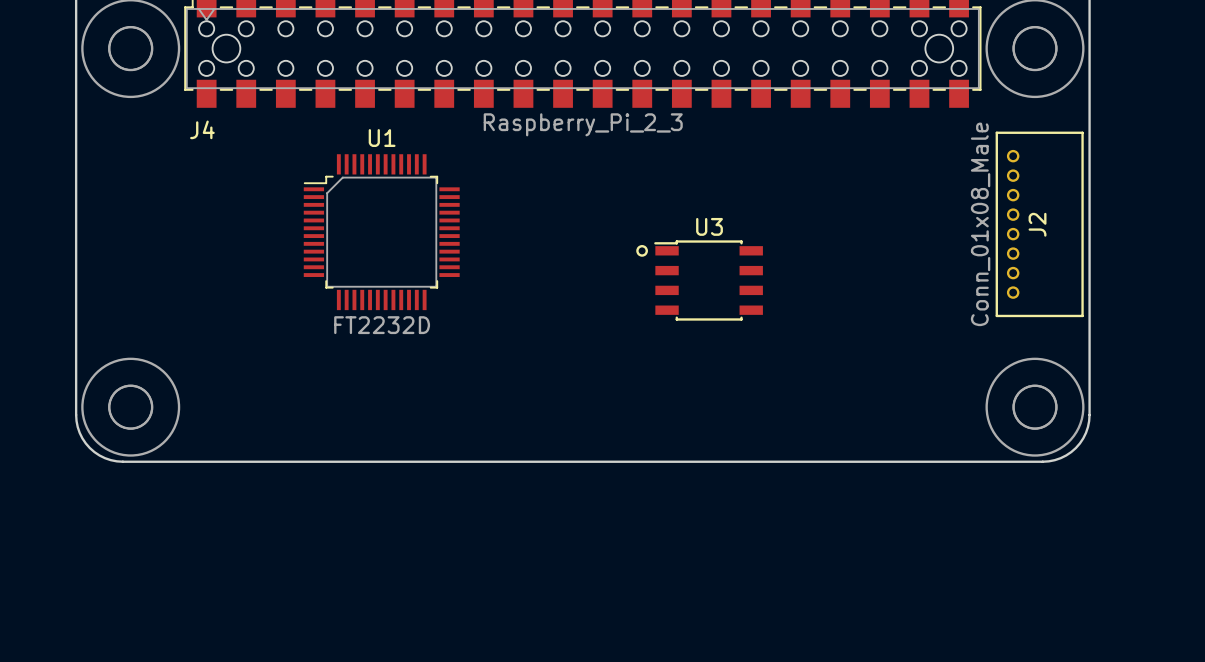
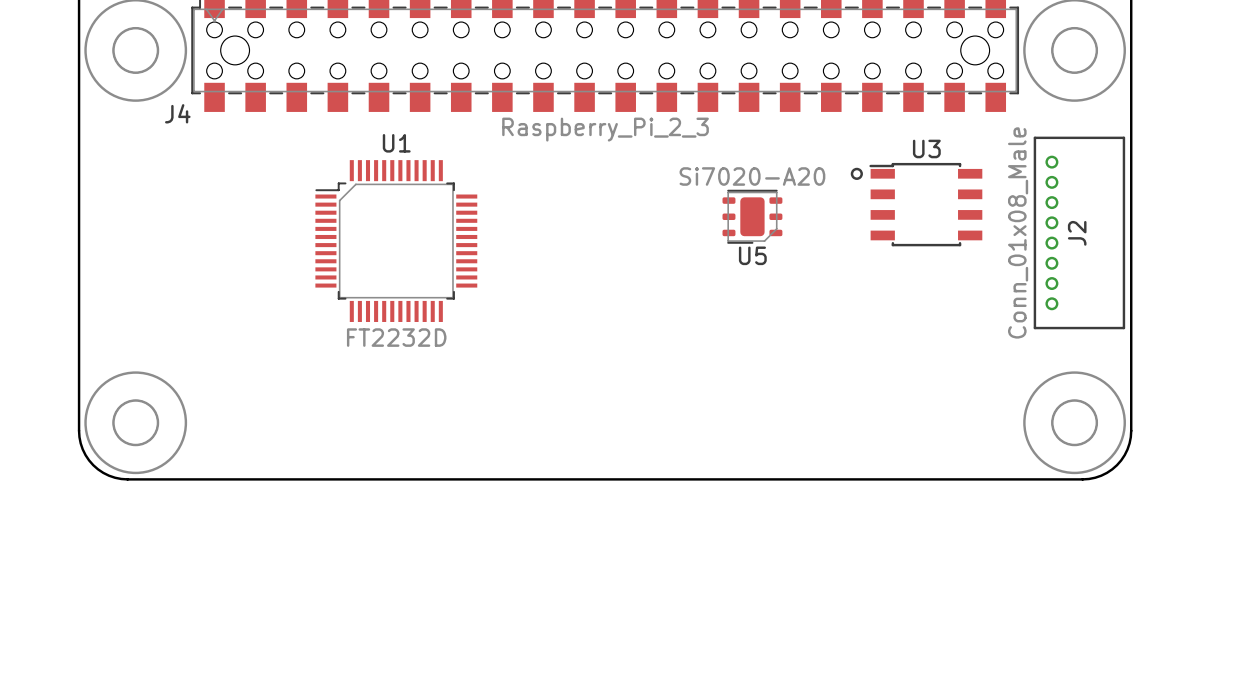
J4 name position: J4 (202, 129) -> J4 (177, 113)
U5: none -> Si7020-A20 (752, 216)
U3 position: (699, 280) -> (916, 204)

